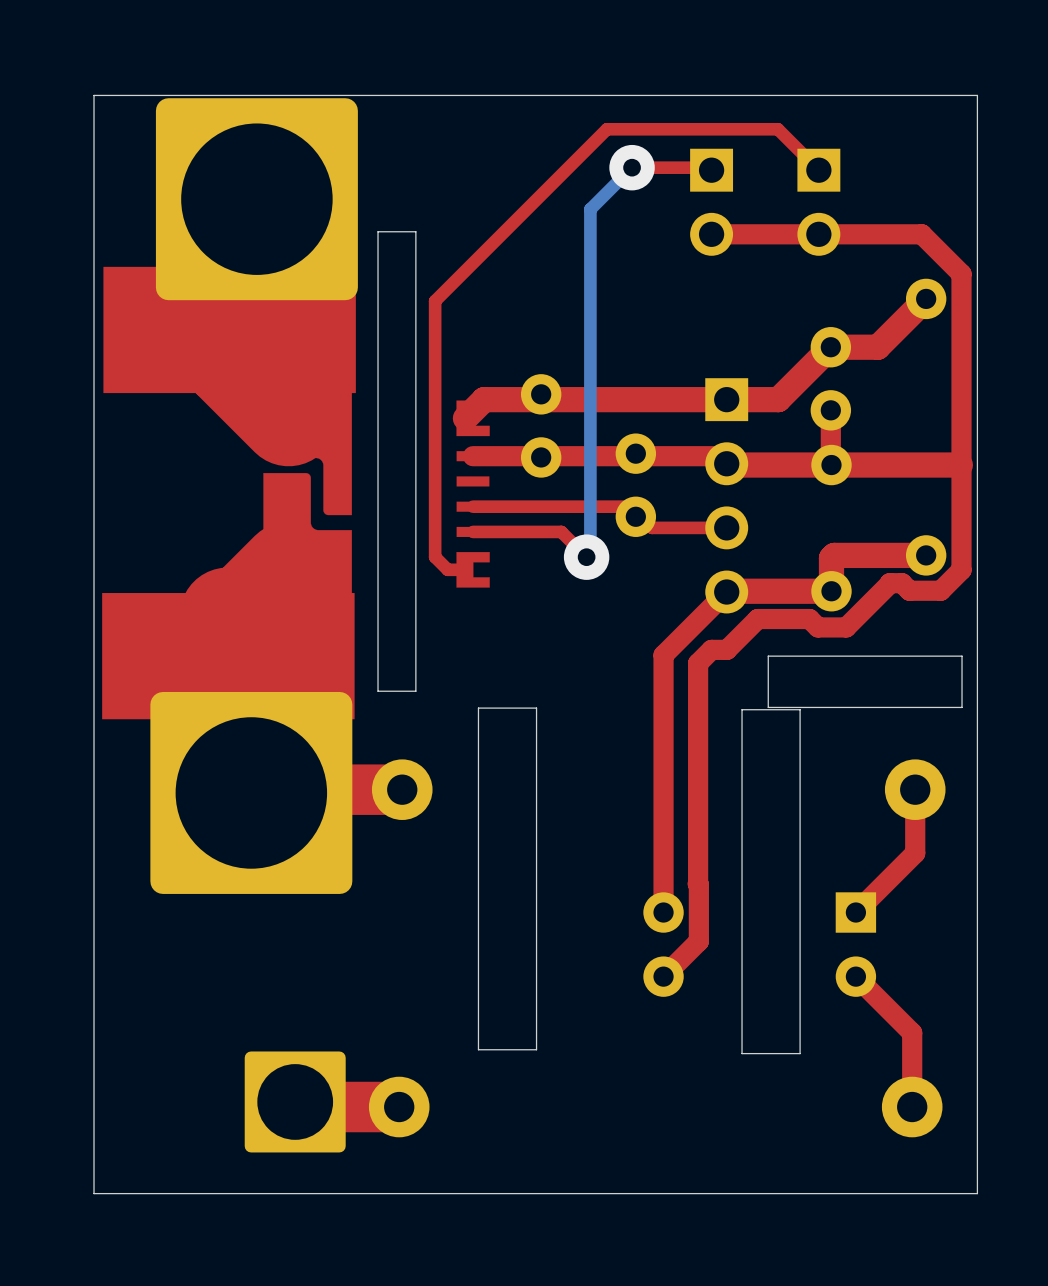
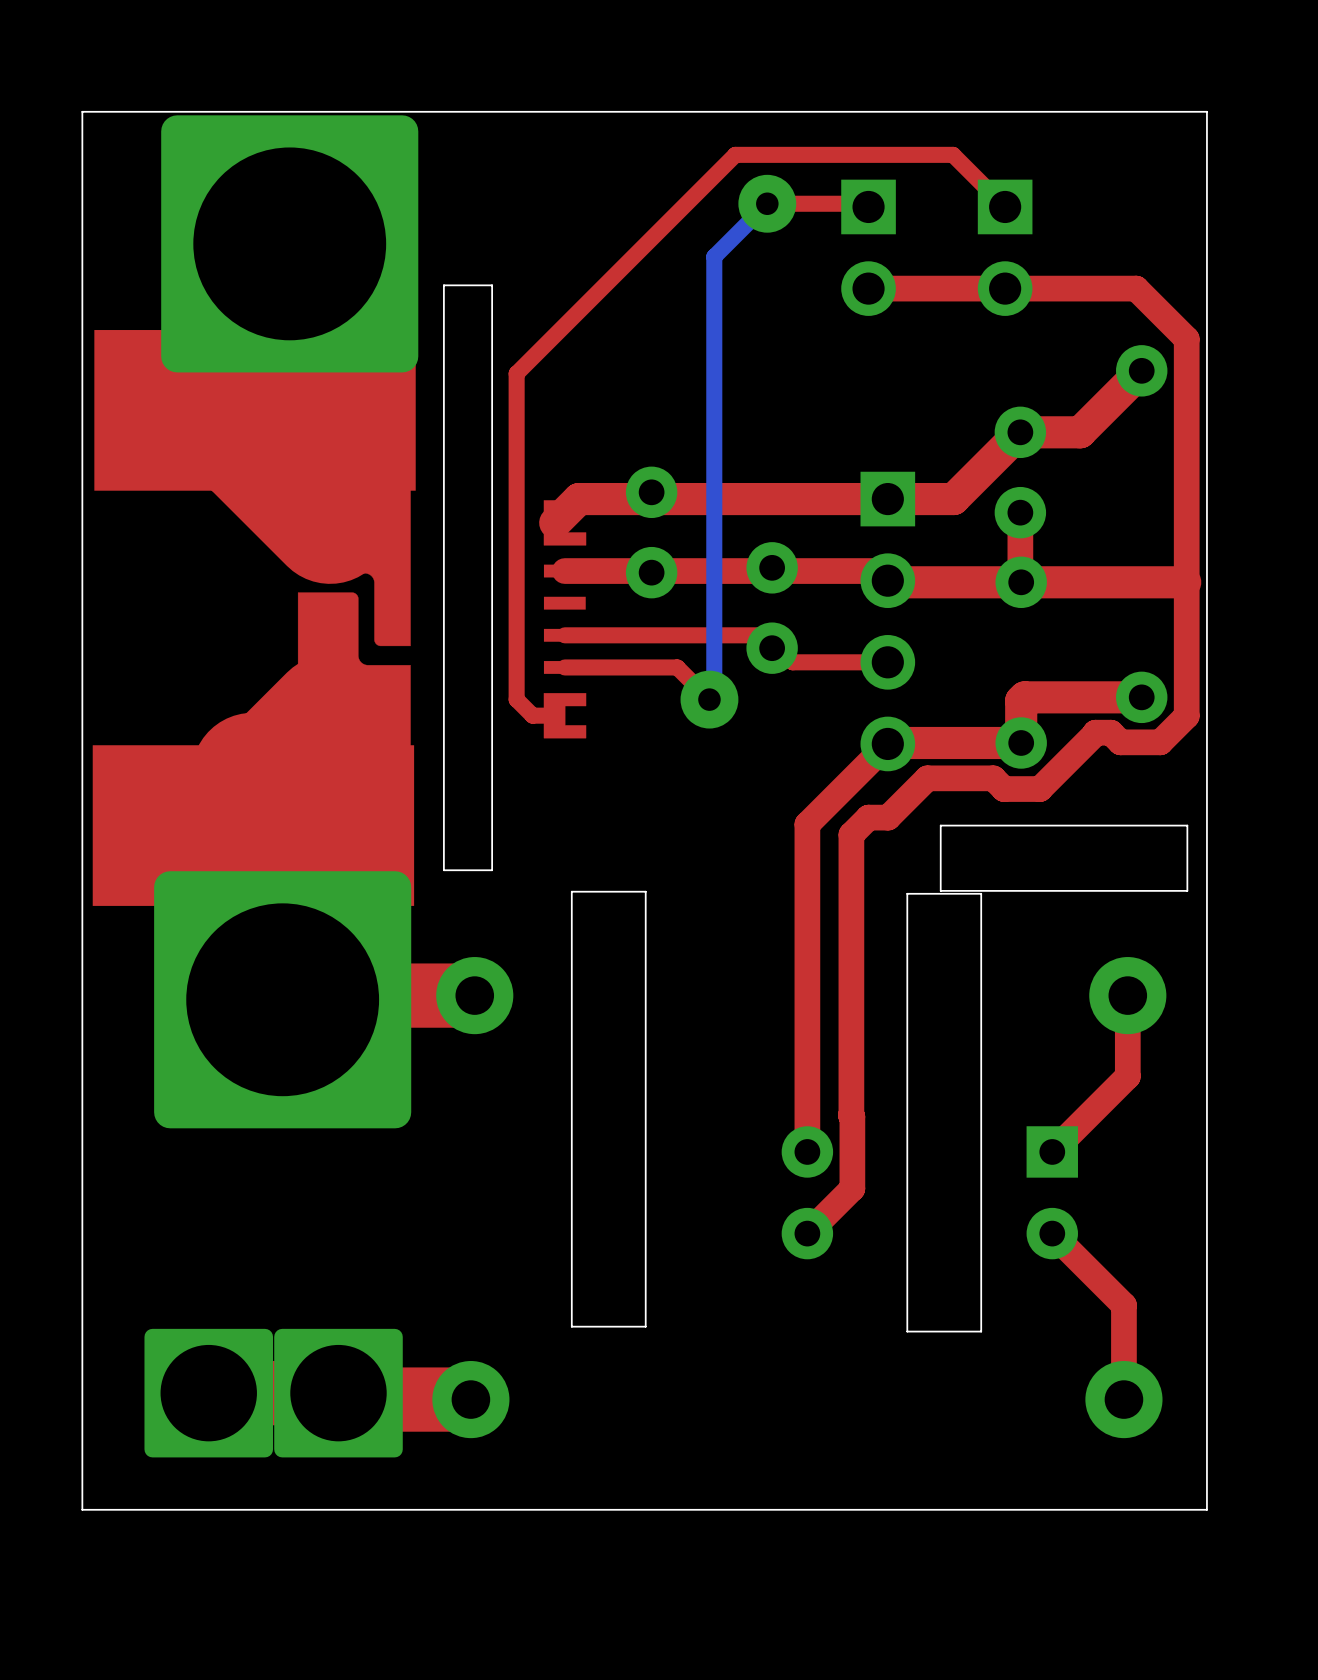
part: none -> (208, 1393)

